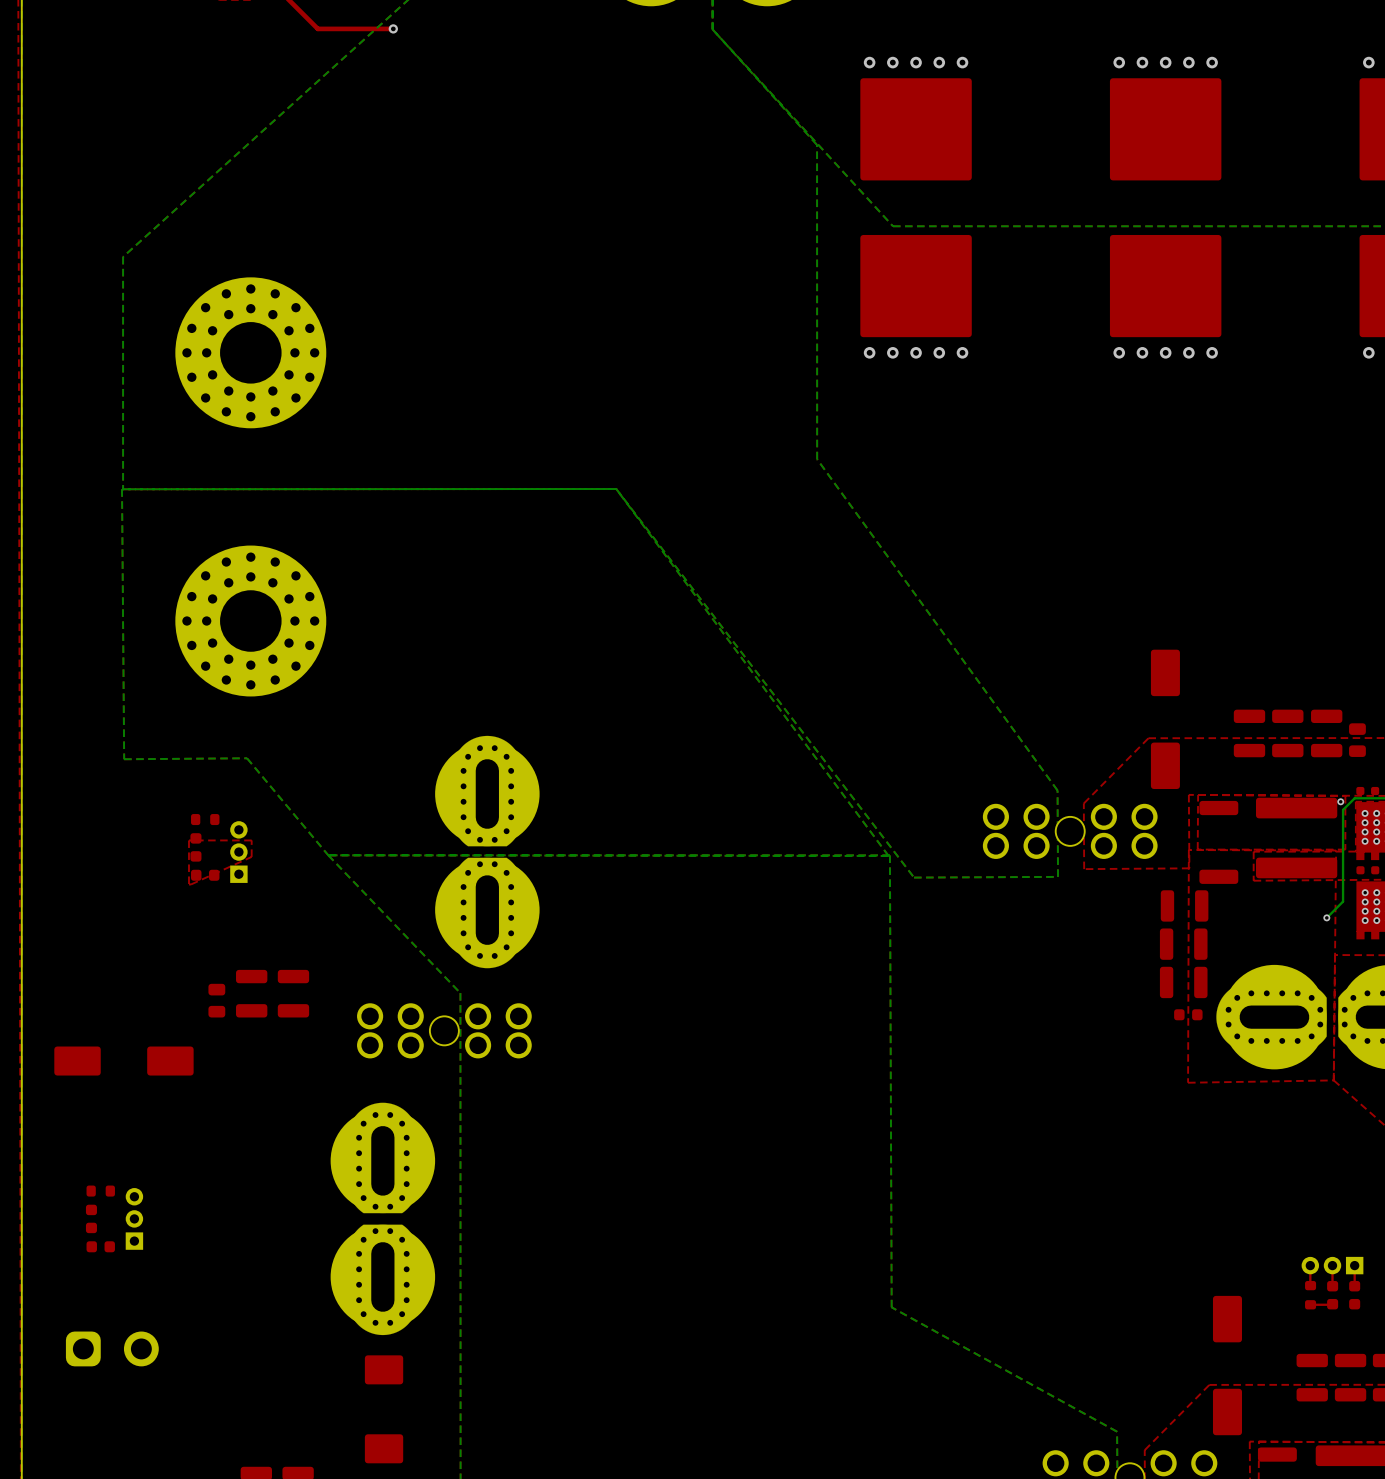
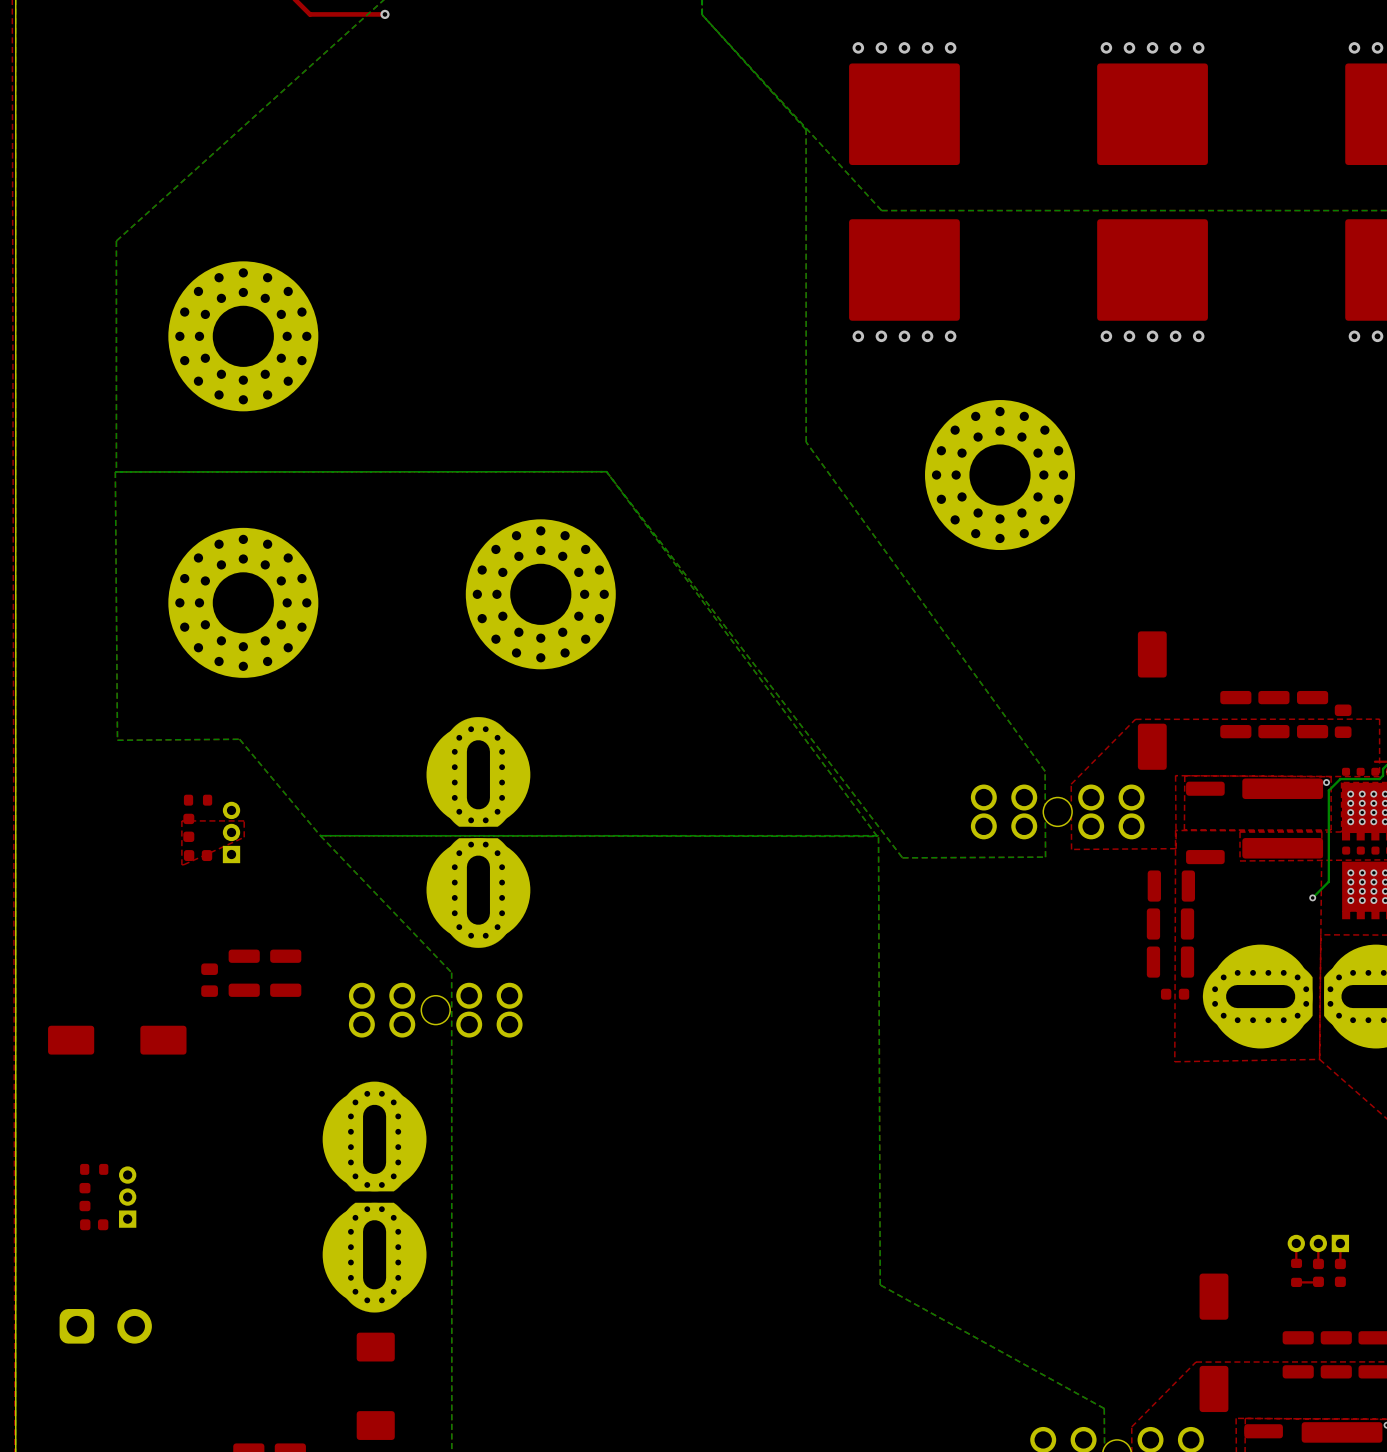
part: none -> (1000, 475)
part: none -> (540, 594)

